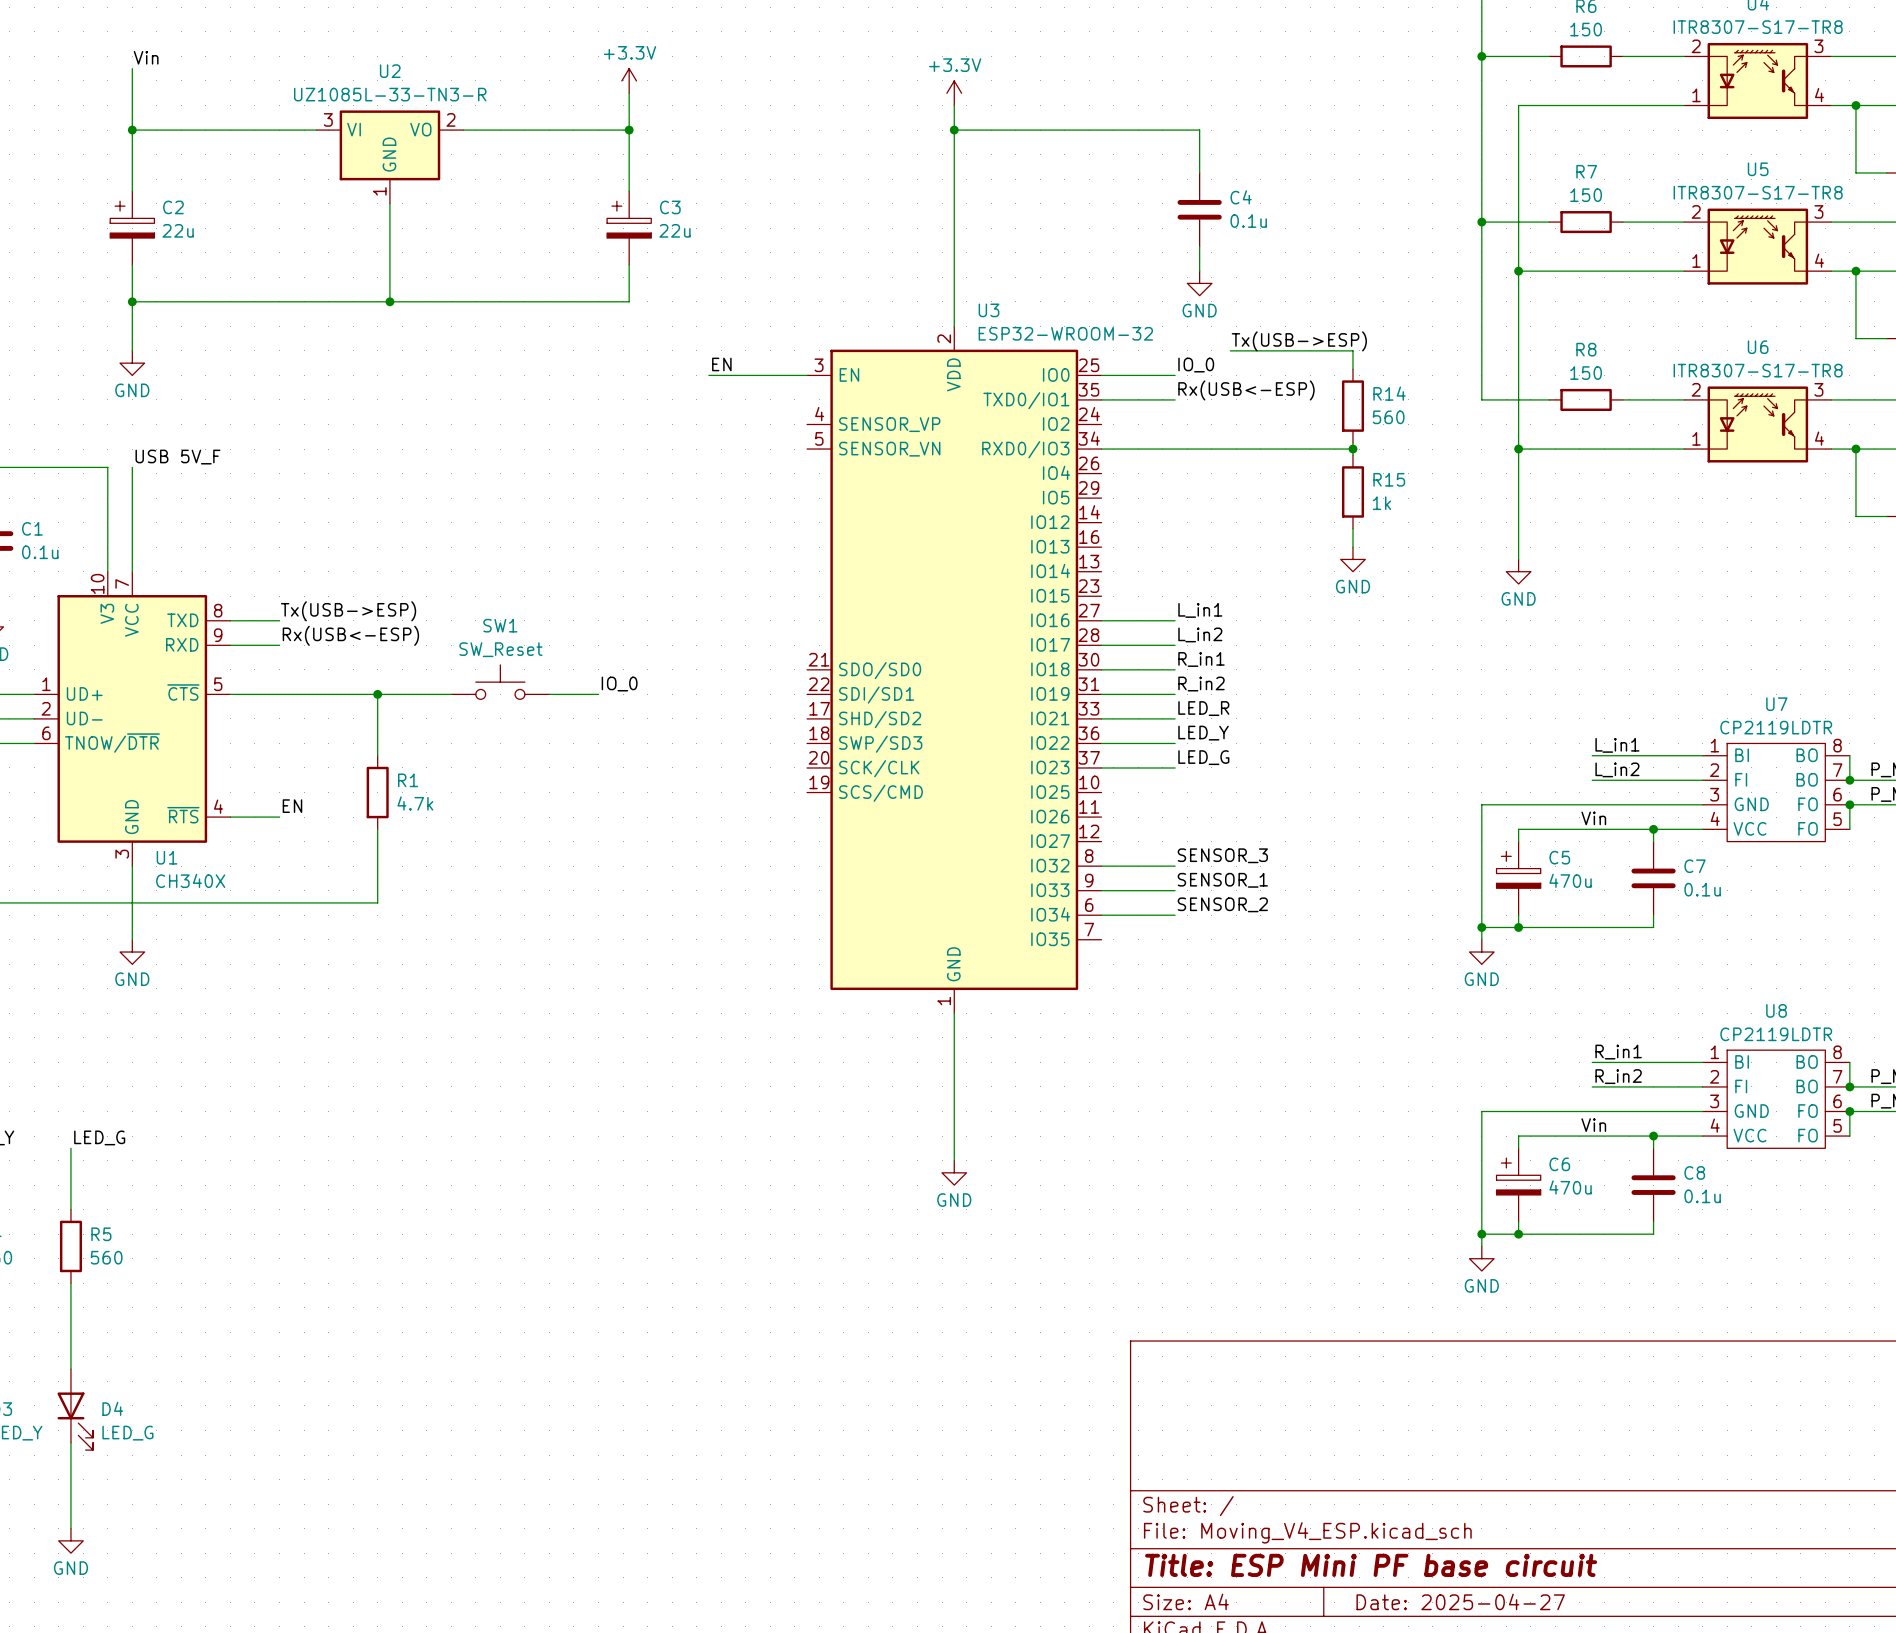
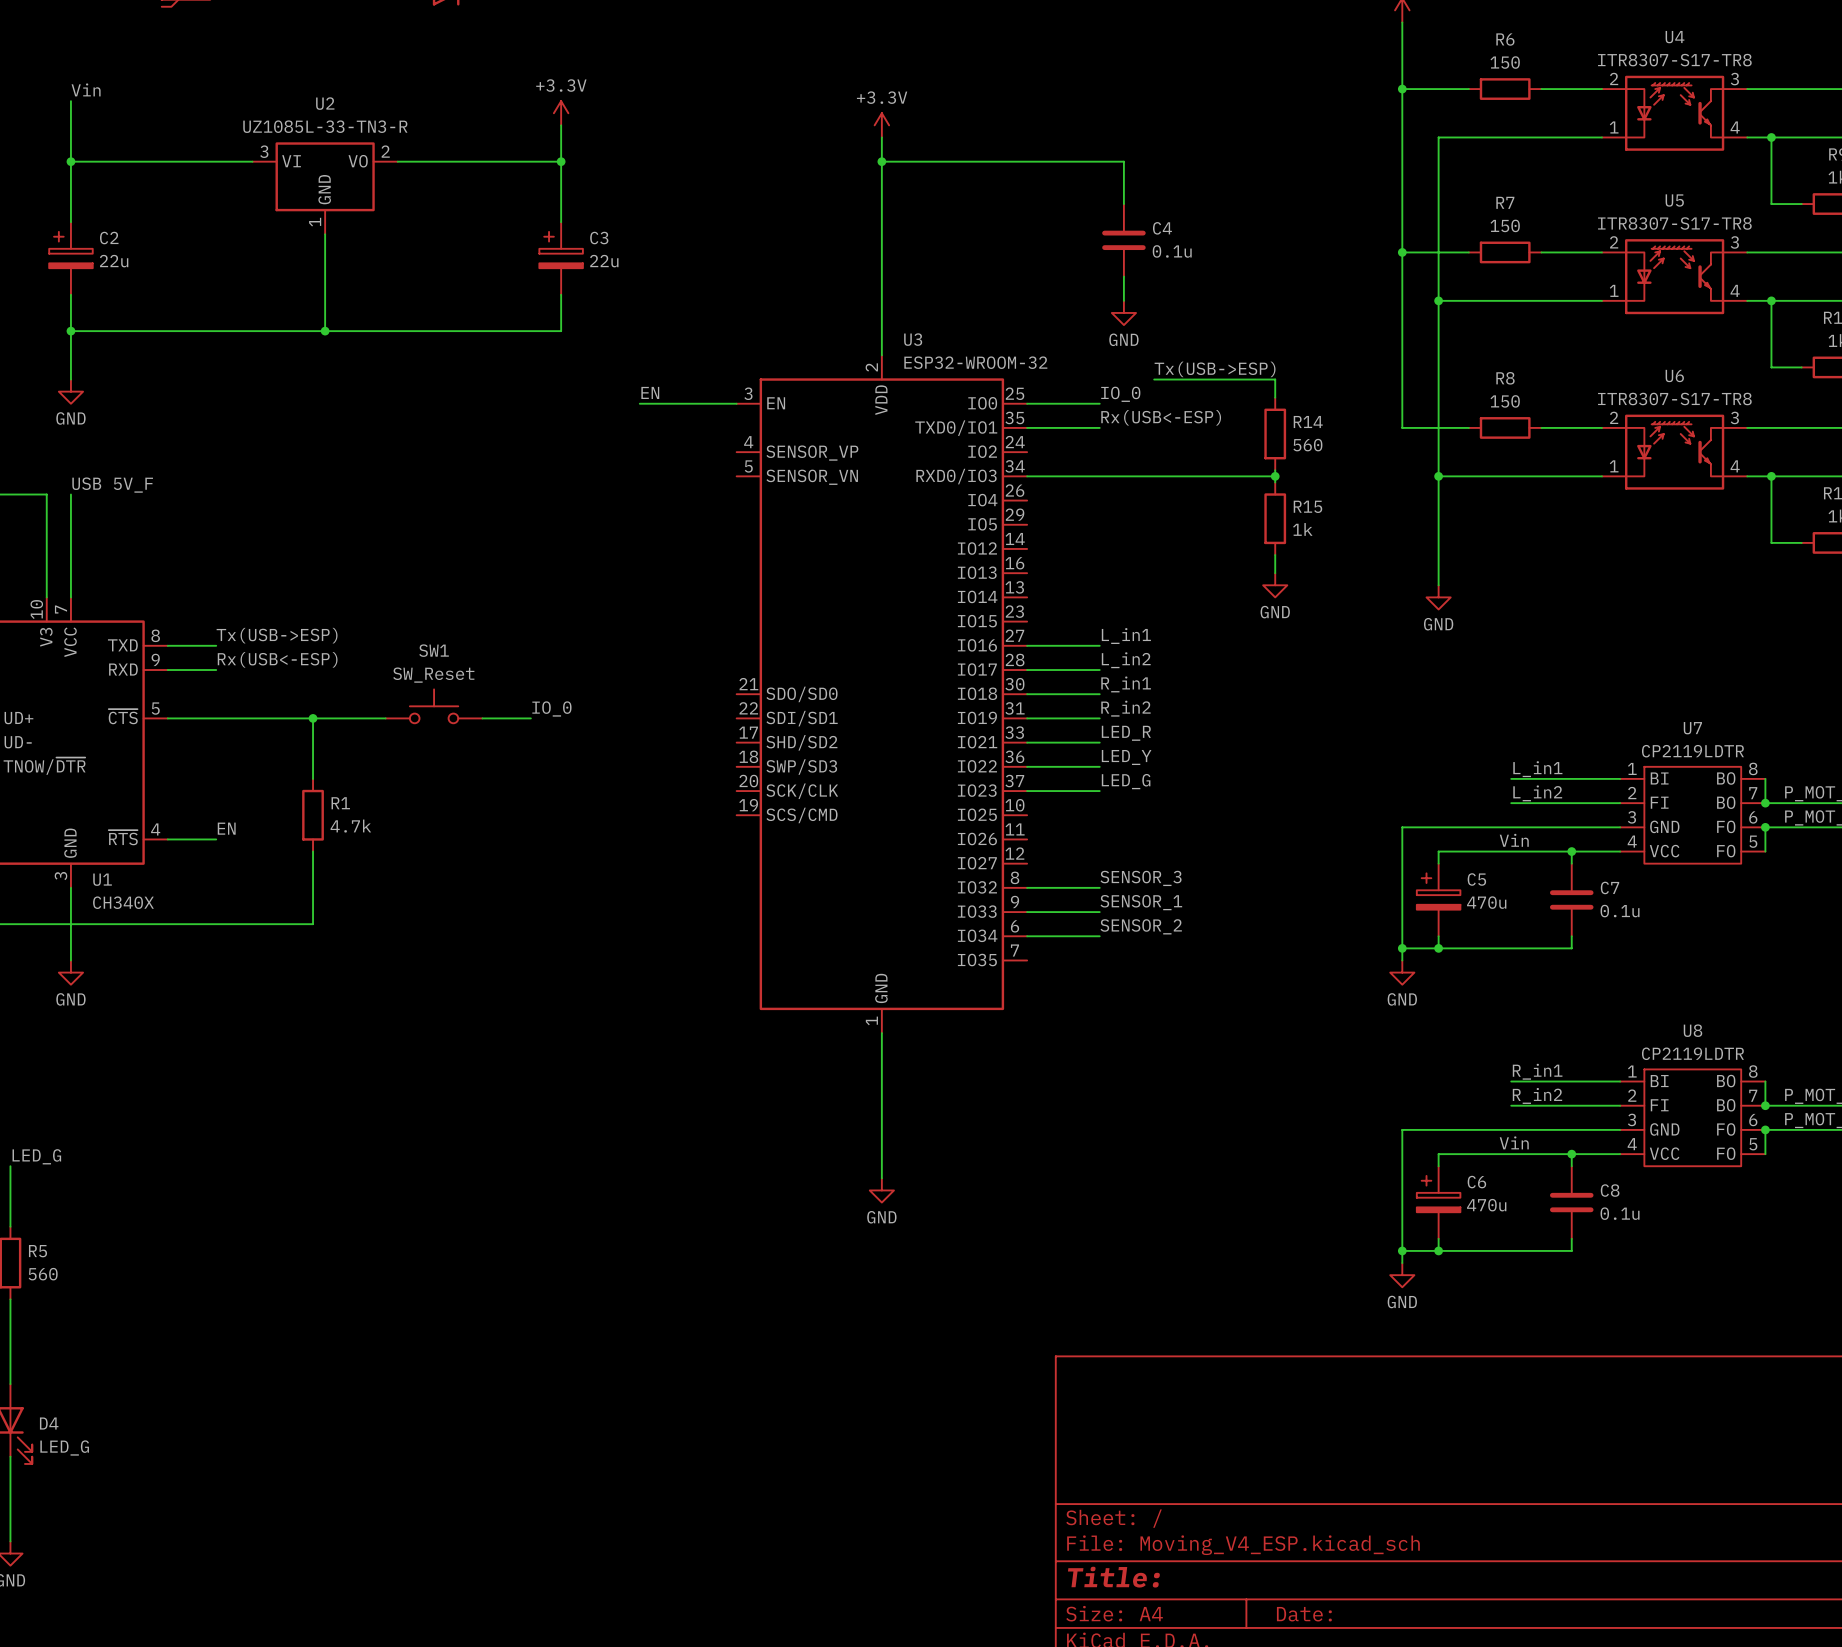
title block: Title: ESP Mini PF base circuit (1371, 1565) -> Title: (1113, 1577)
title block: Date: 2025-04-27 (1460, 1601) -> Date: (1304, 1614)

